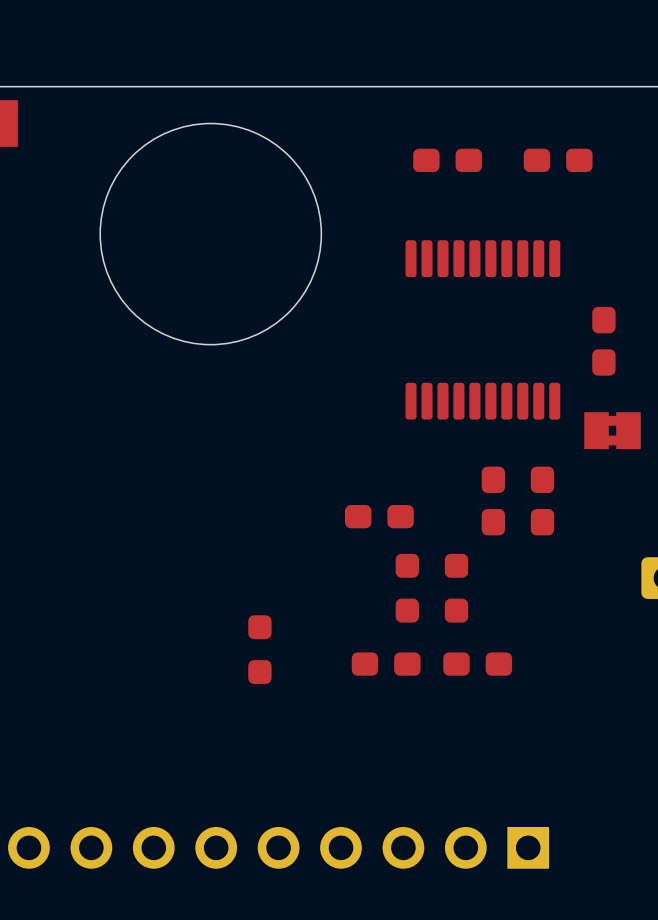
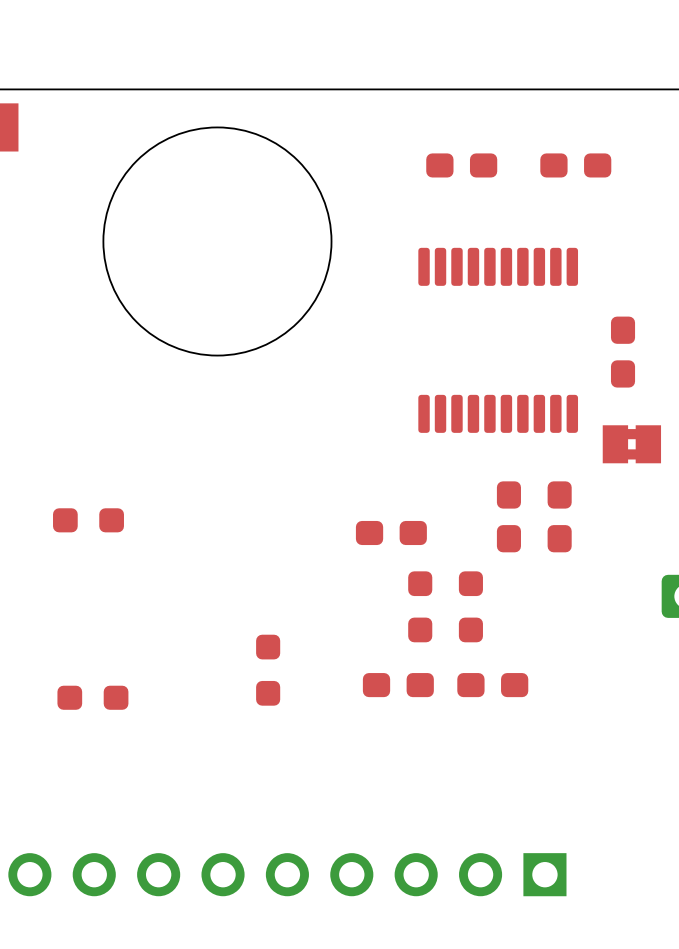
part: none -> (88, 520)
part: none -> (92, 697)

